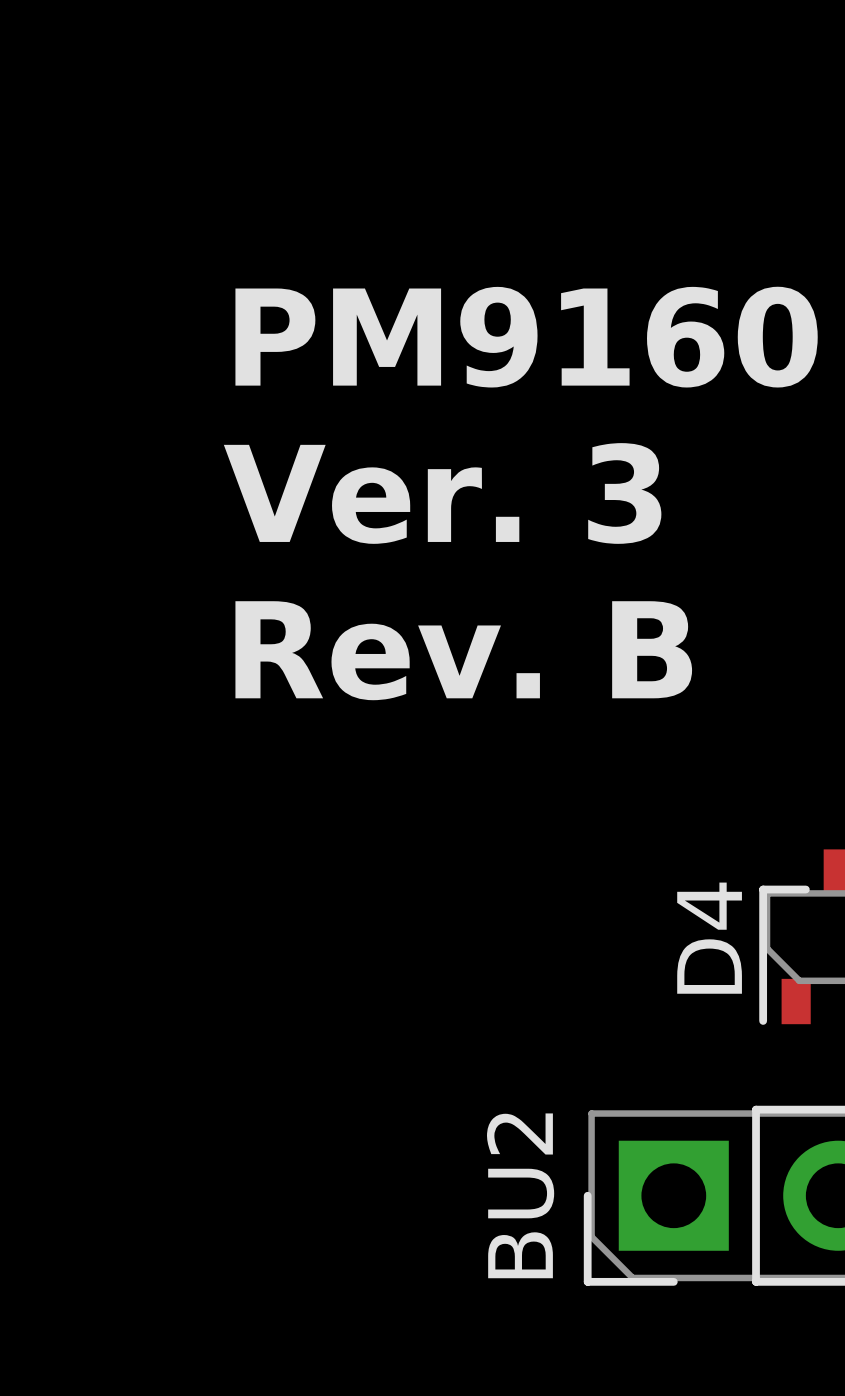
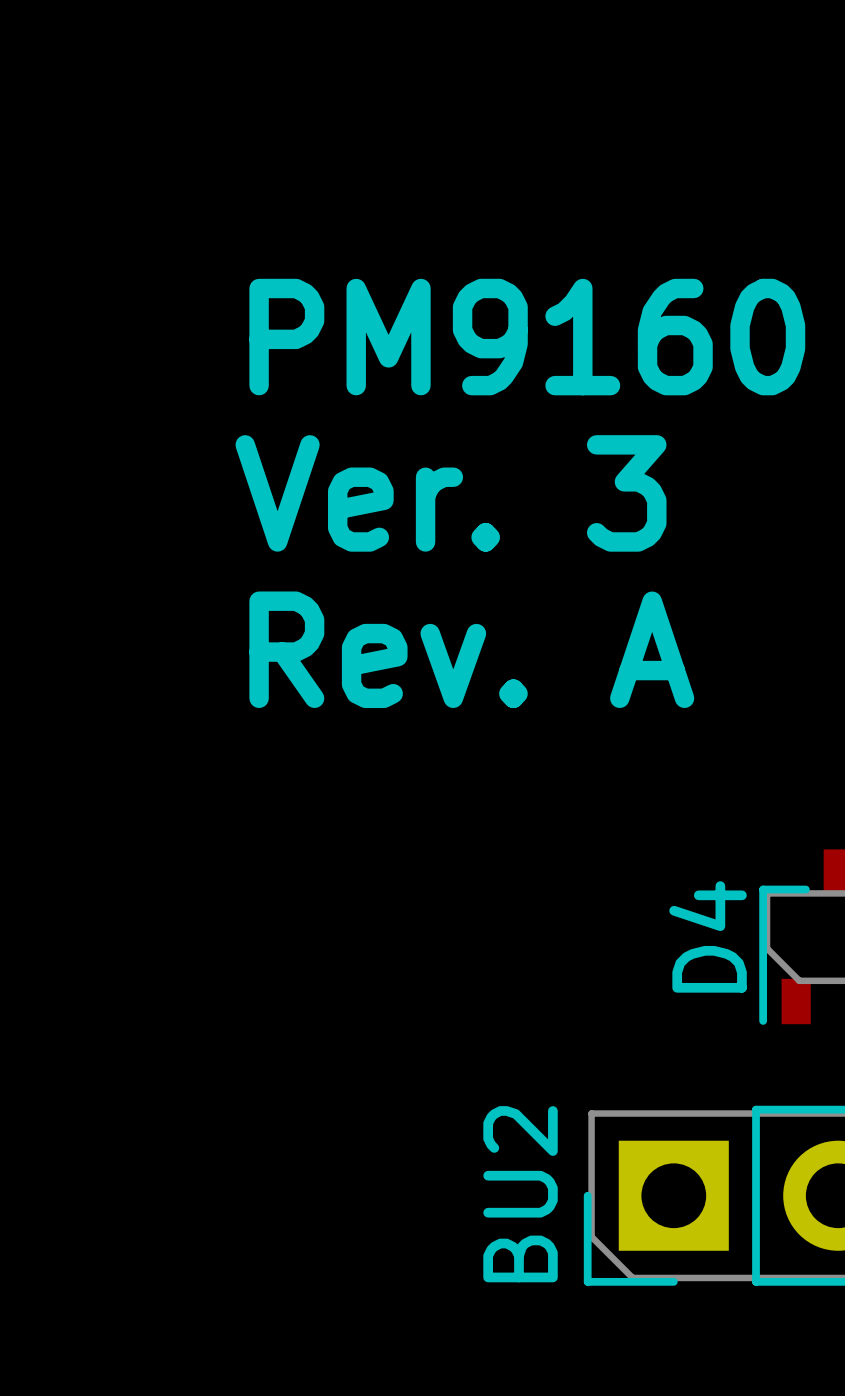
text: Rev. B (463, 650) -> Rev. A (471, 649)

